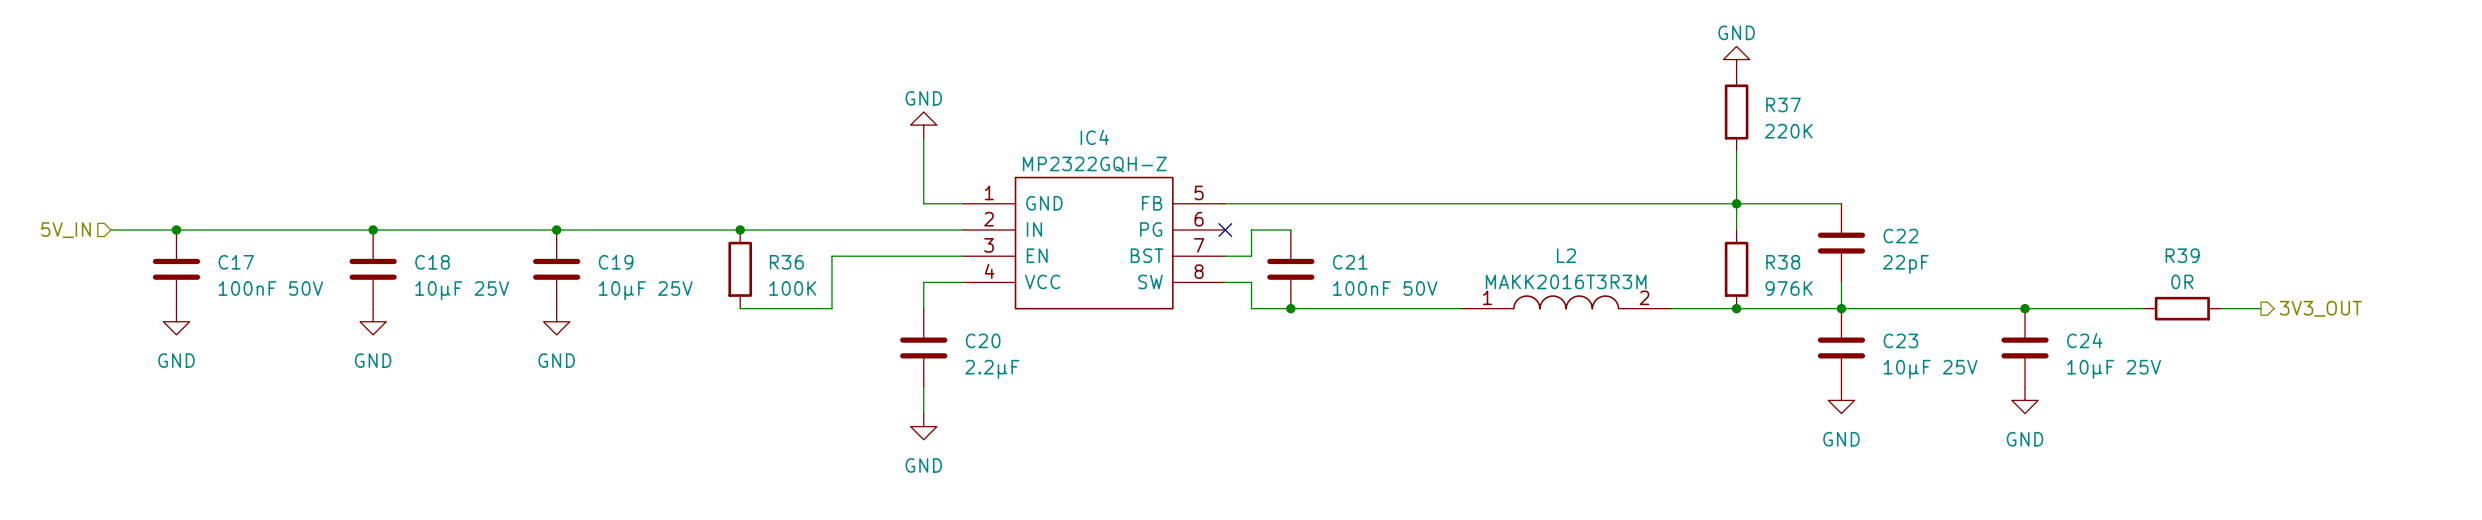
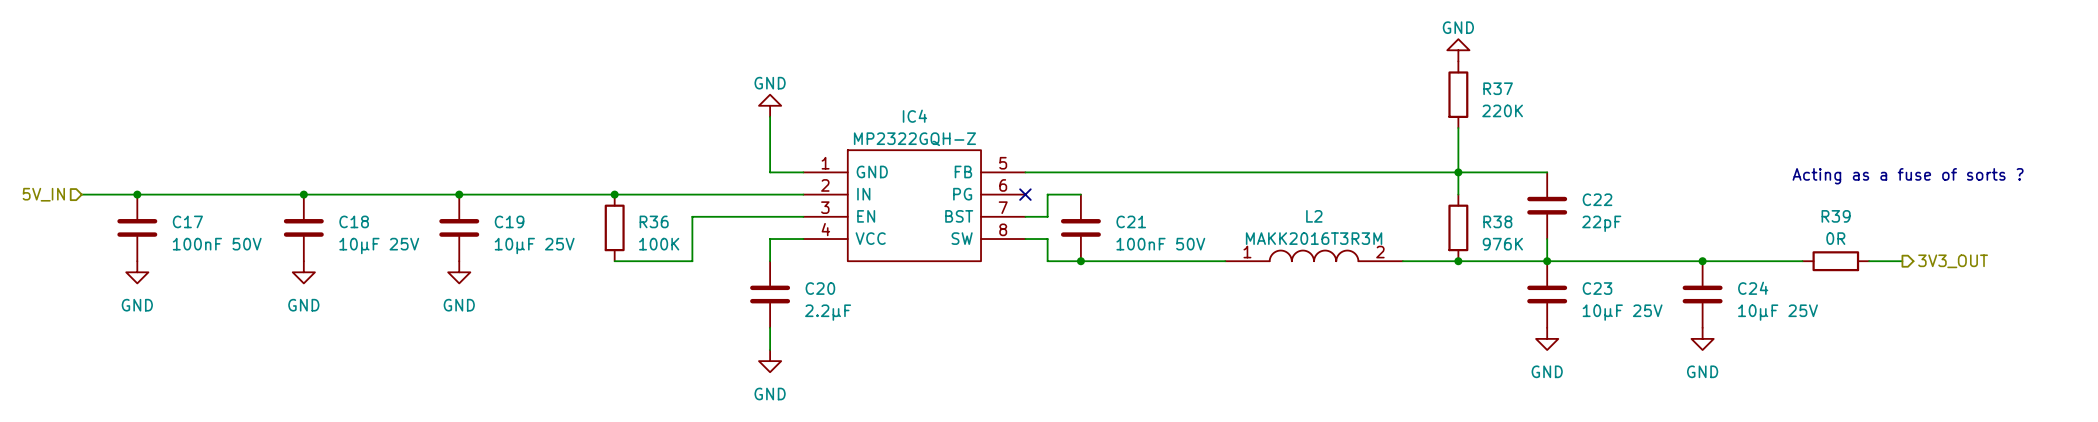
text: none -> Acting as a fuse of sorts ? (1908, 176)

